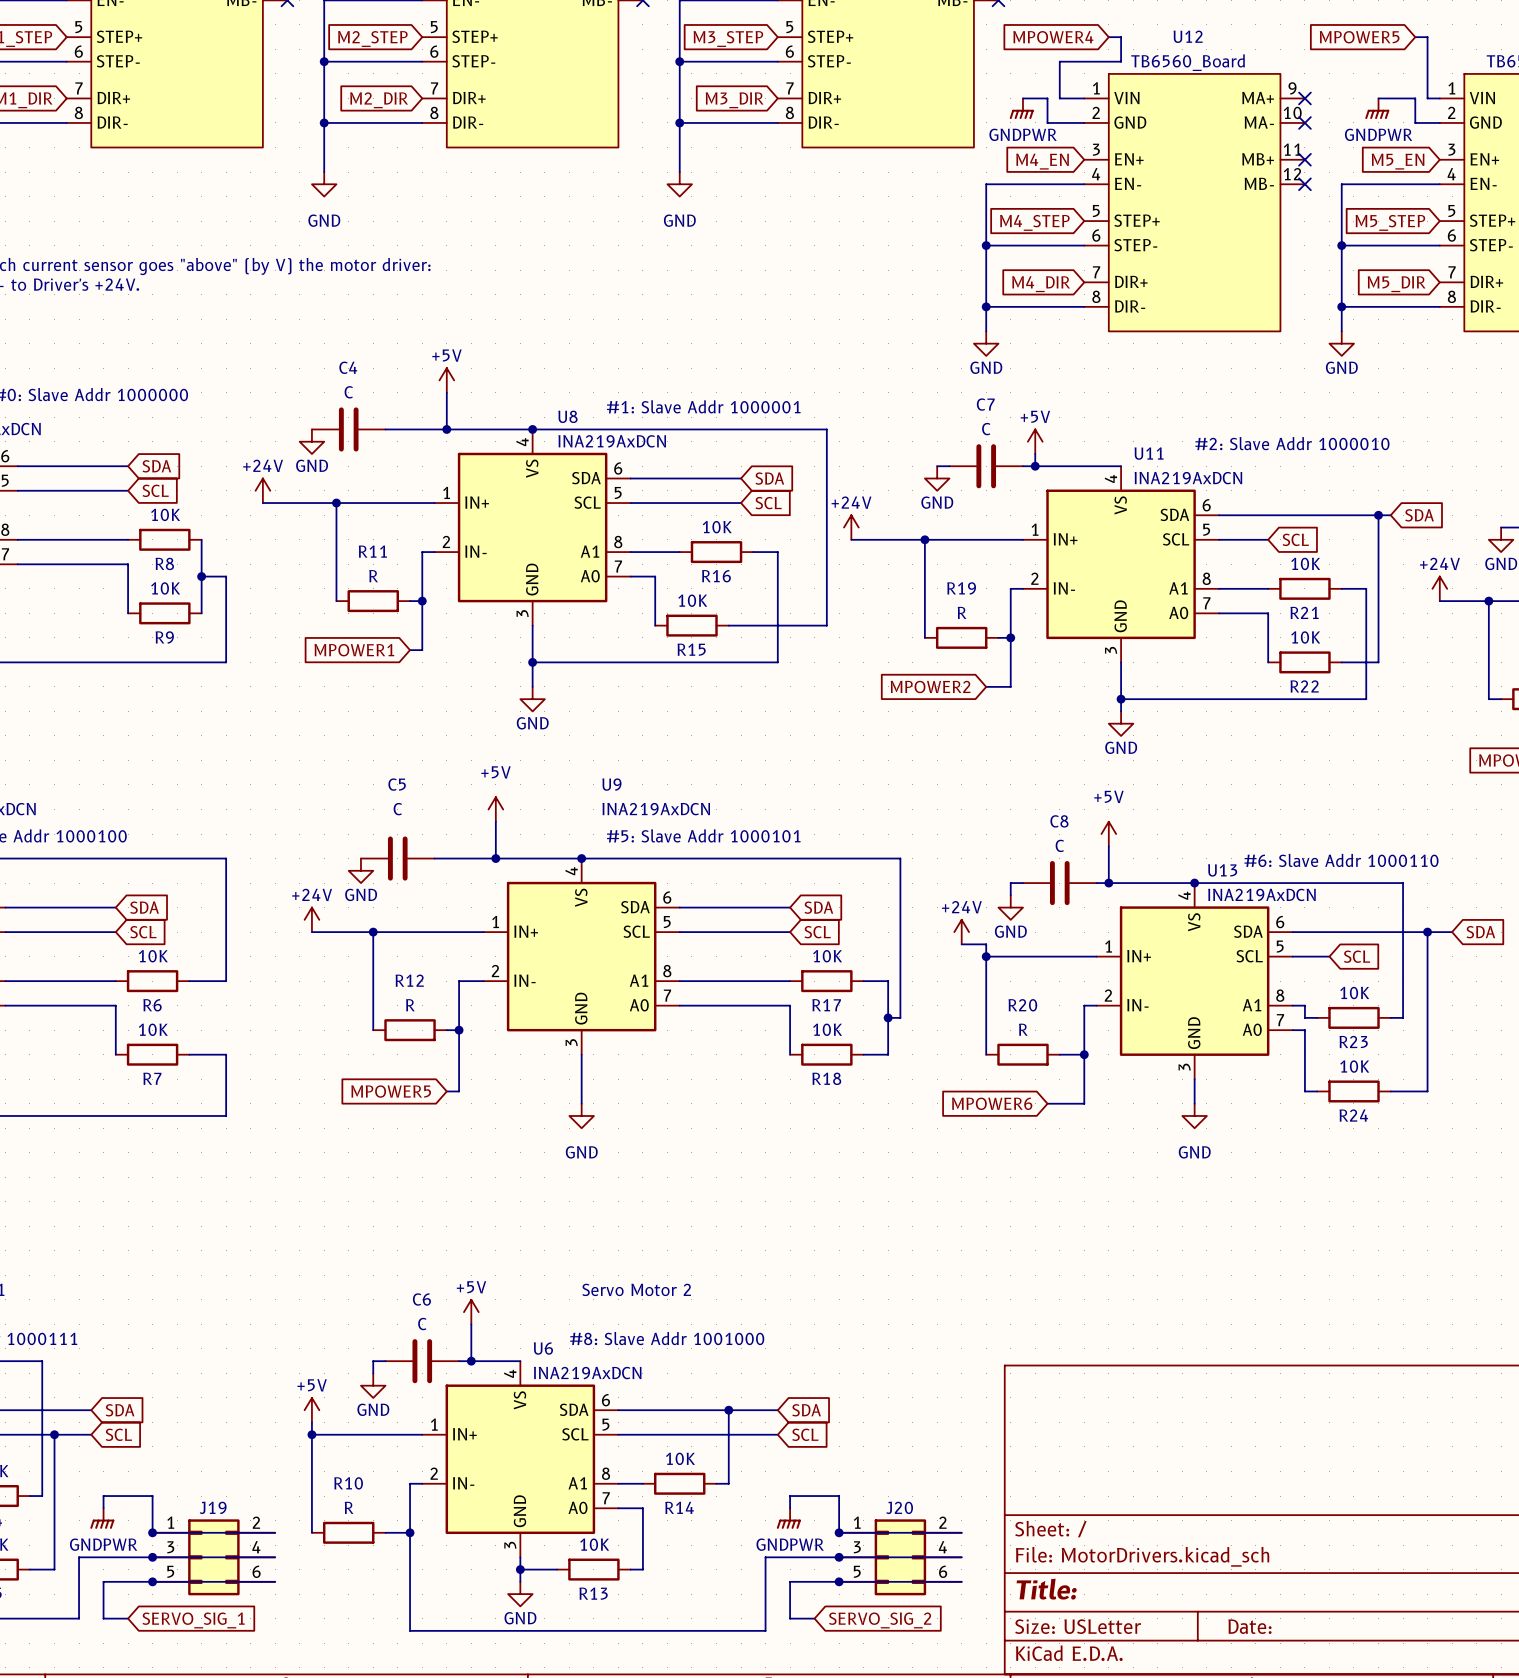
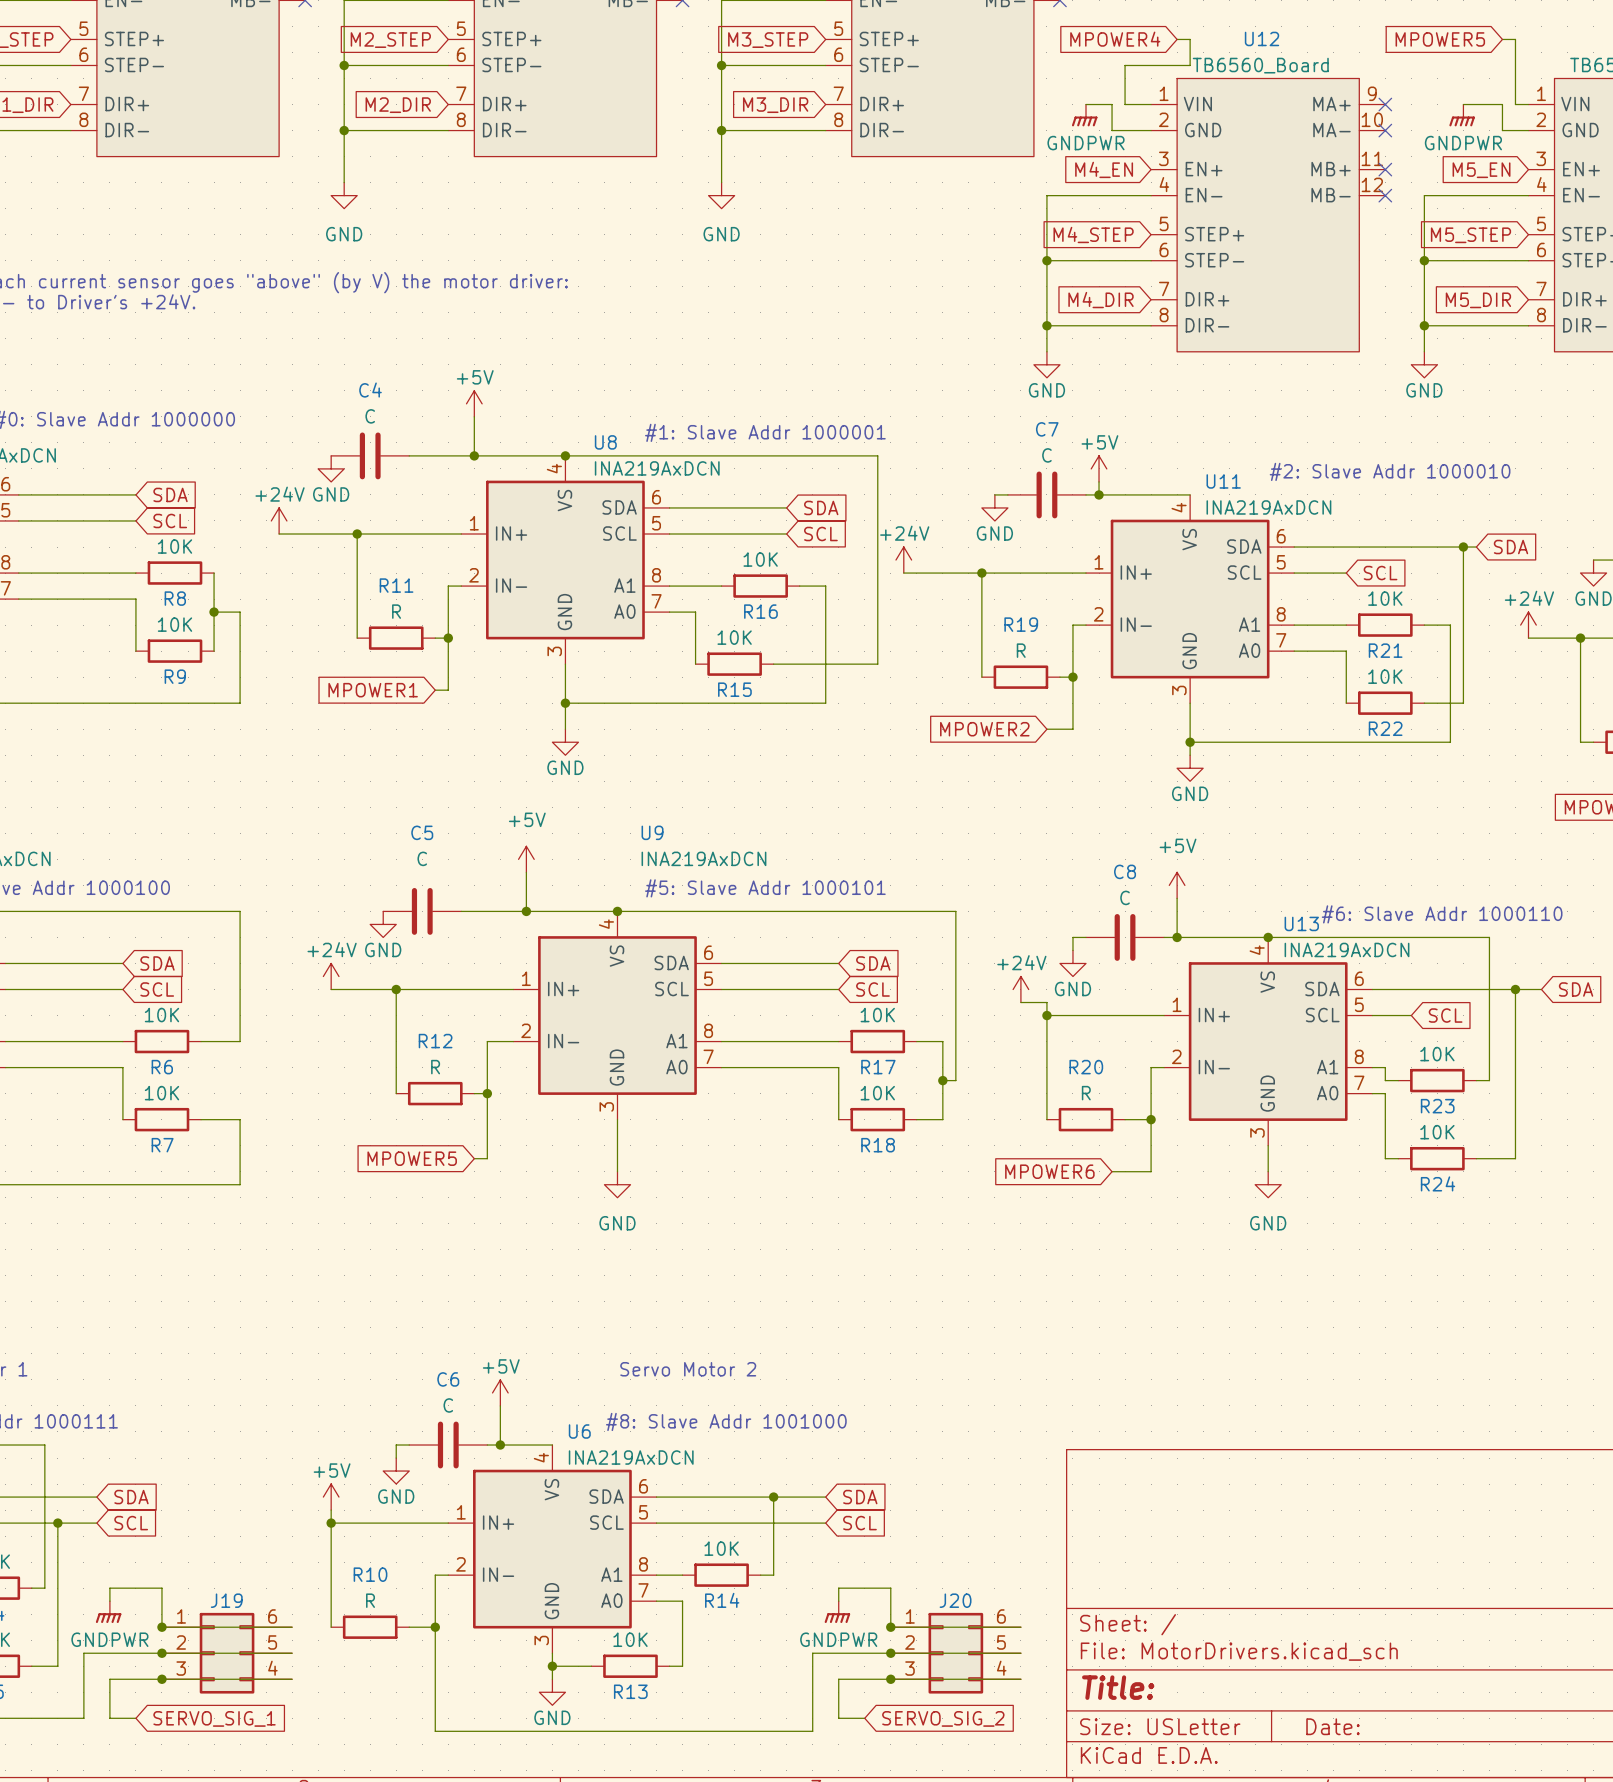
J19 pin number: 2 (256, 1522) -> 6 (272, 1616)
J20 pin number: 2 (942, 1522) -> 6 (1001, 1616)
J19 pin number: 3 (170, 1547) -> 2 (181, 1642)
J19 pin number: 4 (256, 1547) -> 5 (272, 1642)
J20 pin number: 3 (857, 1547) -> 2 (909, 1642)
J20 pin number: 4 (942, 1547) -> 5 (1001, 1642)
J19 pin number: 5 (170, 1571) -> 3 (181, 1668)
J19 pin number: 6 (256, 1571) -> 4 (272, 1668)
J20 pin number: 5 (857, 1571) -> 3 (909, 1668)
J20 pin number: 6 (943, 1571) -> 4 (1001, 1668)

